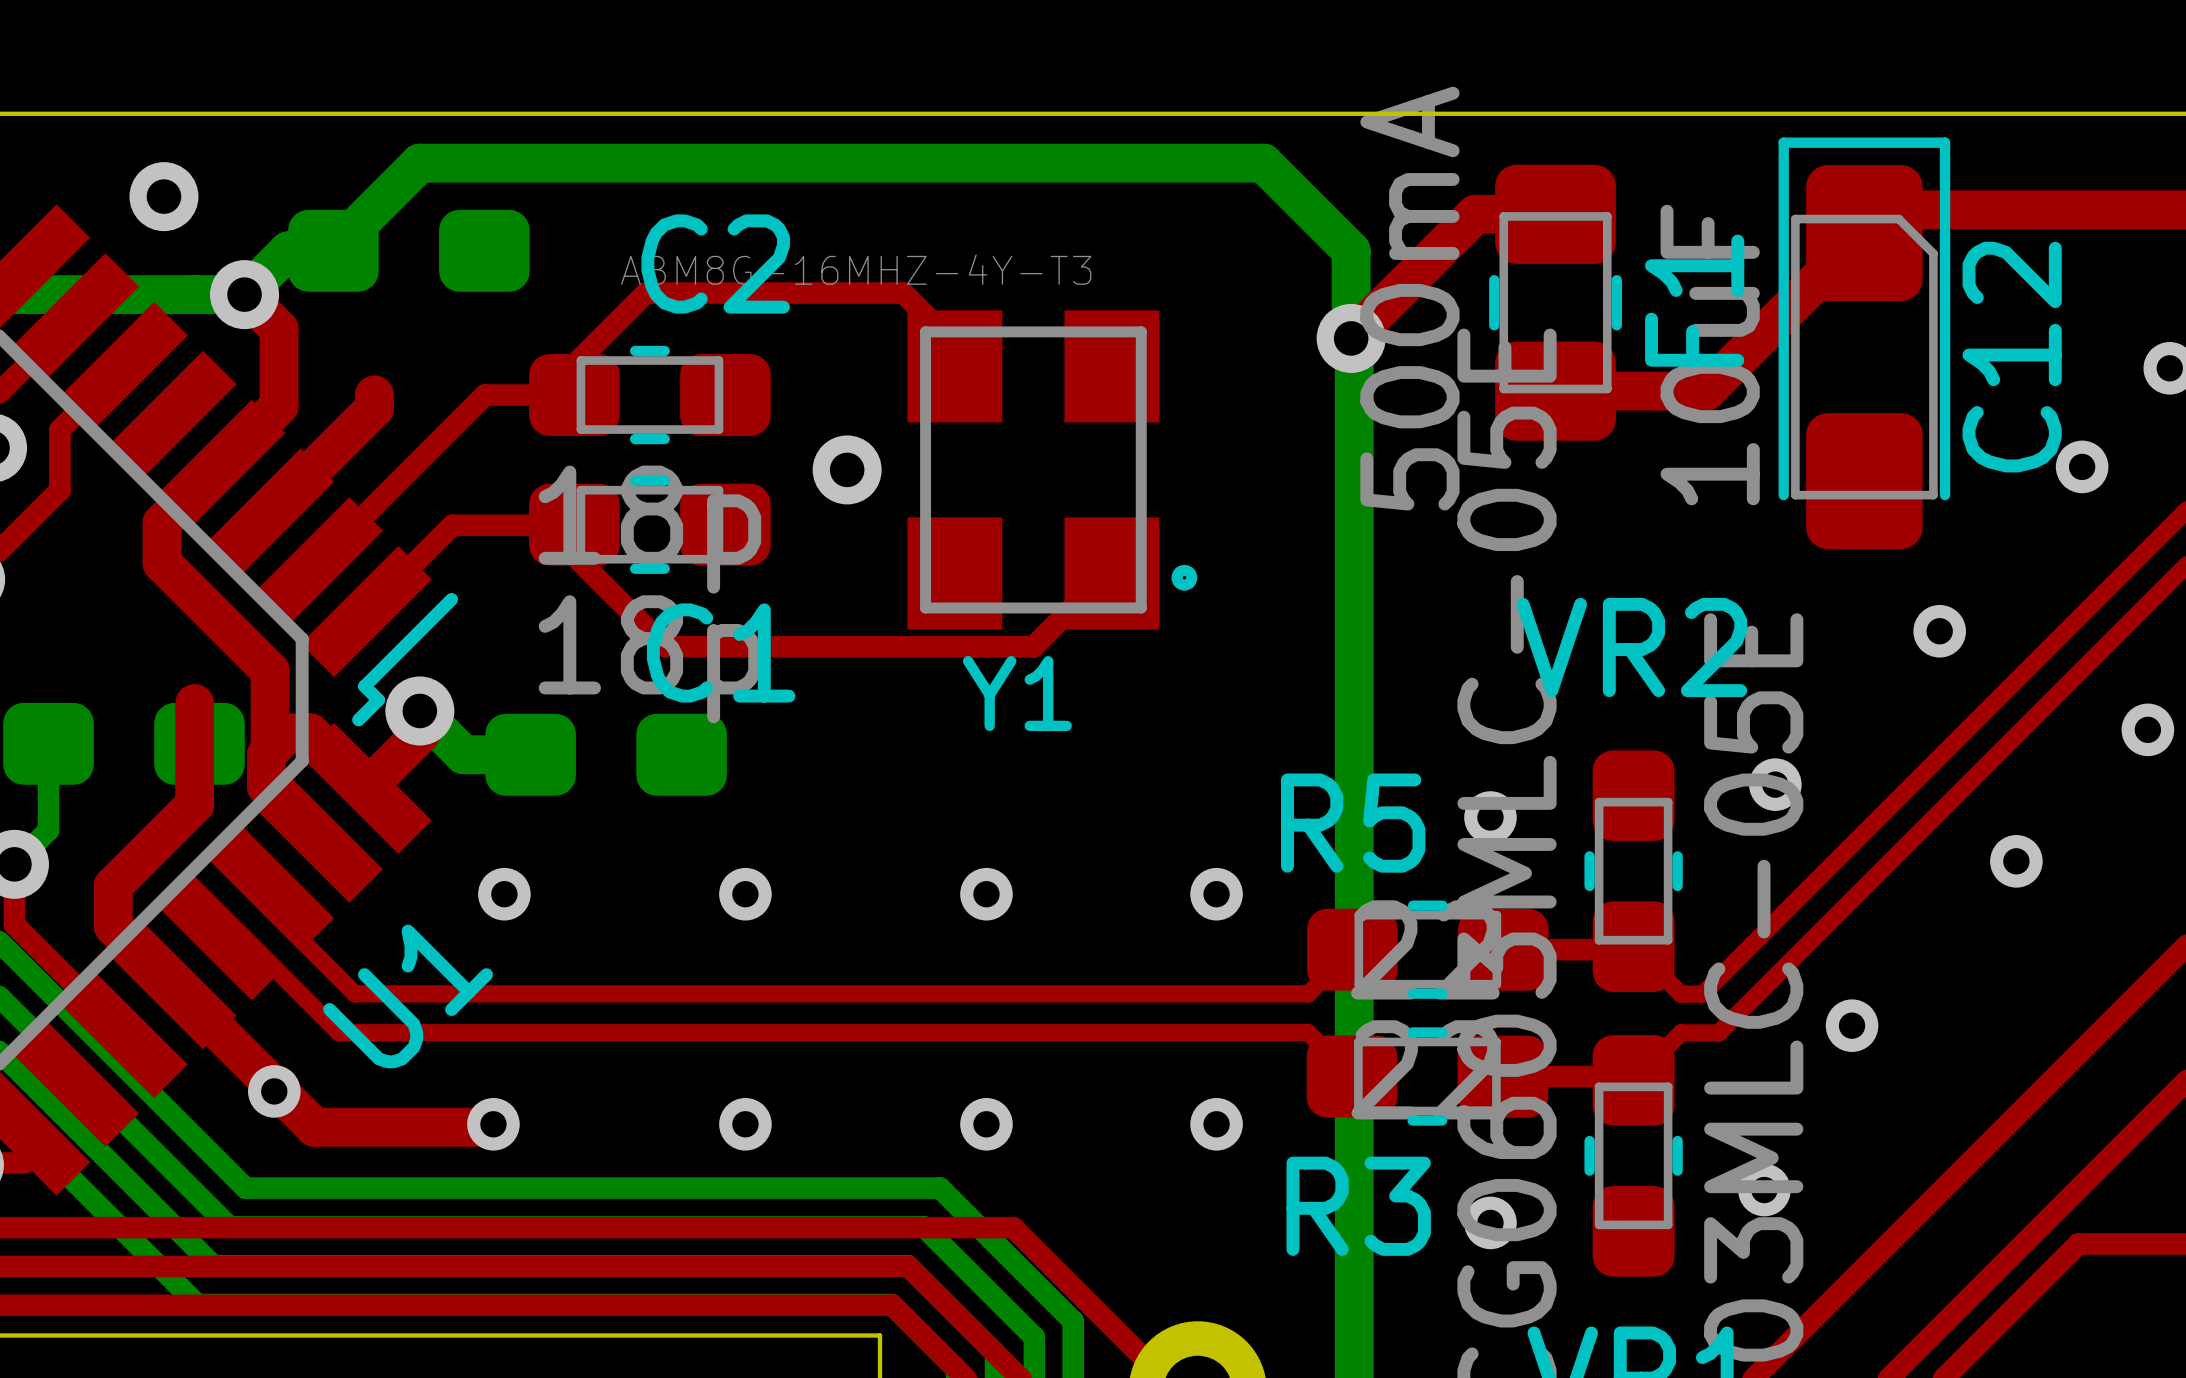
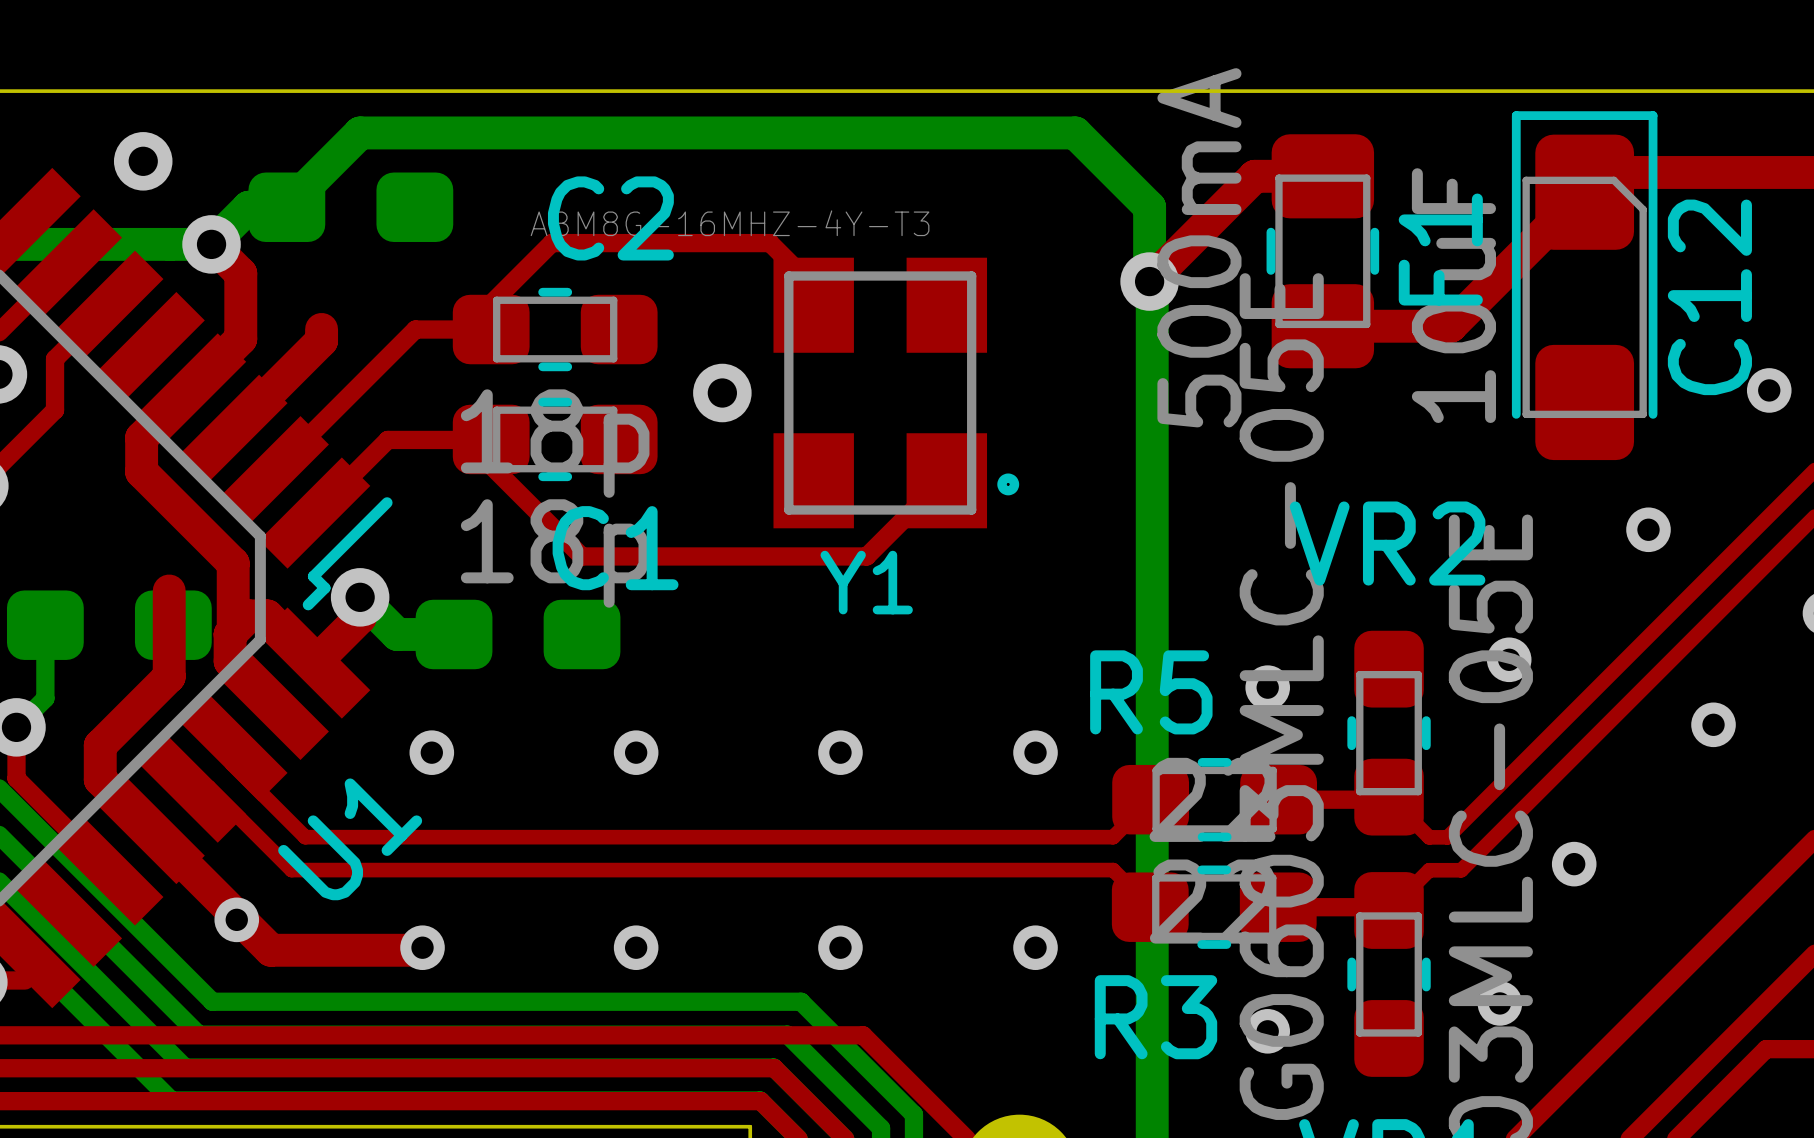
top track: (665, 646) (1033, 646) -> (568, 542) (581, 556) (866, 556) (880, 542)

